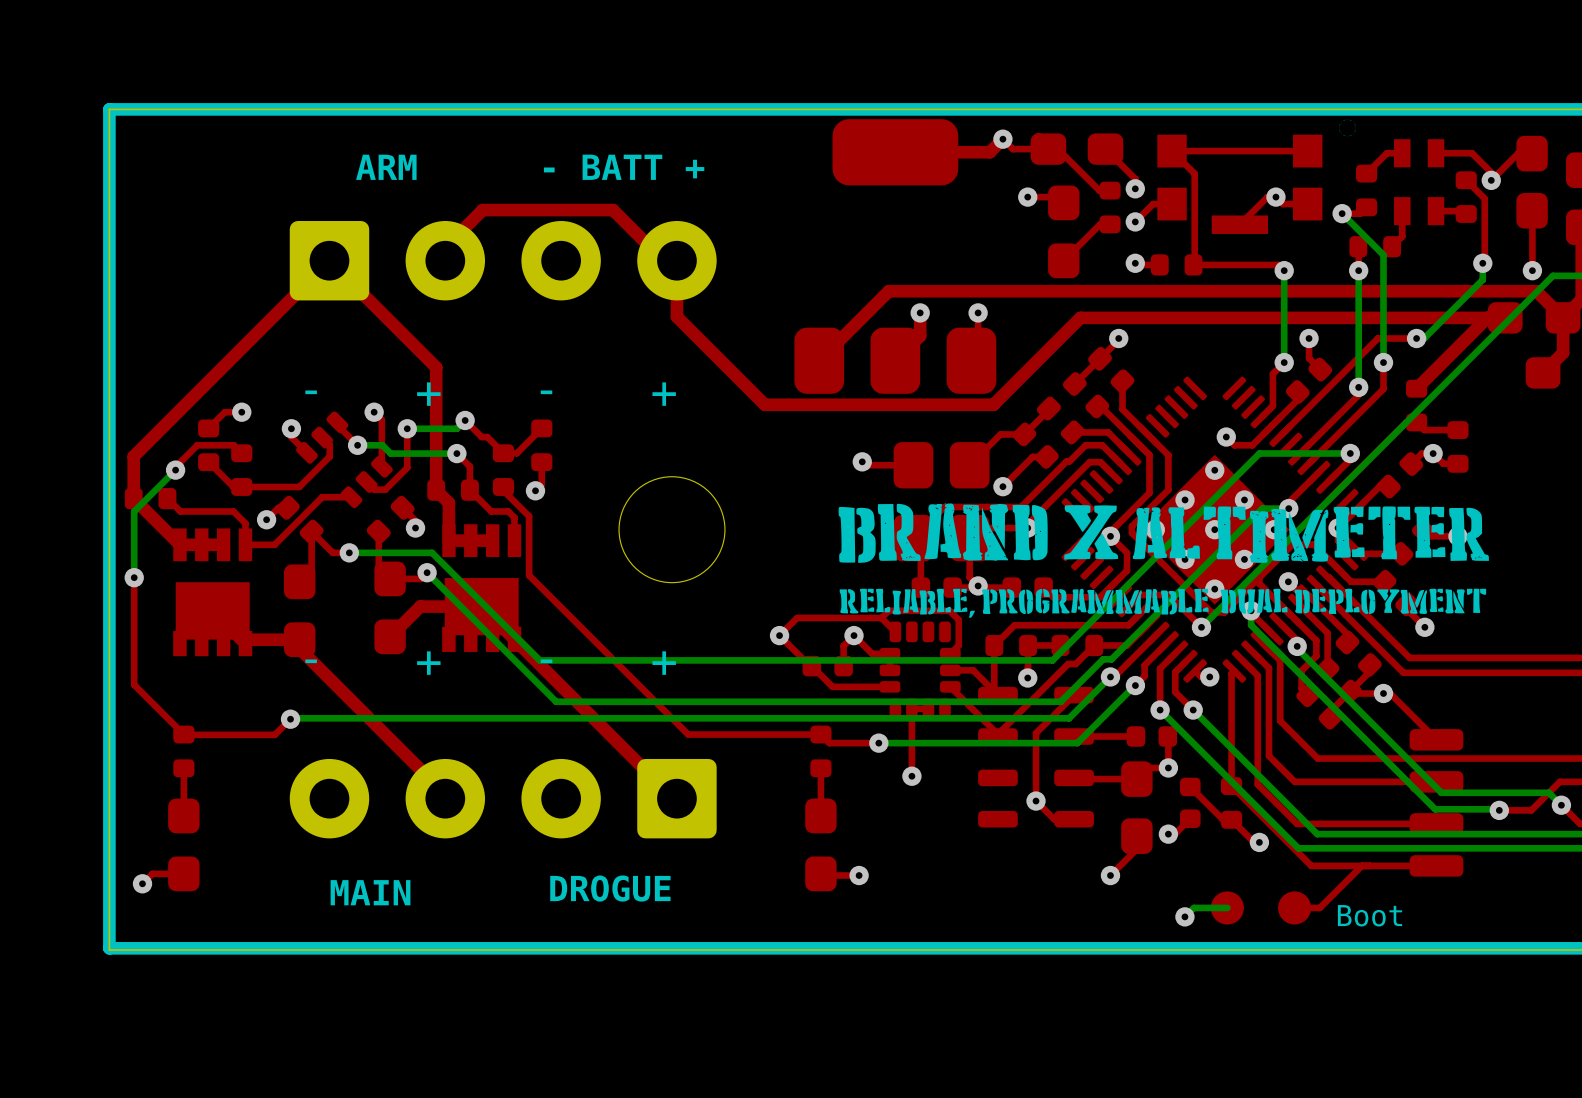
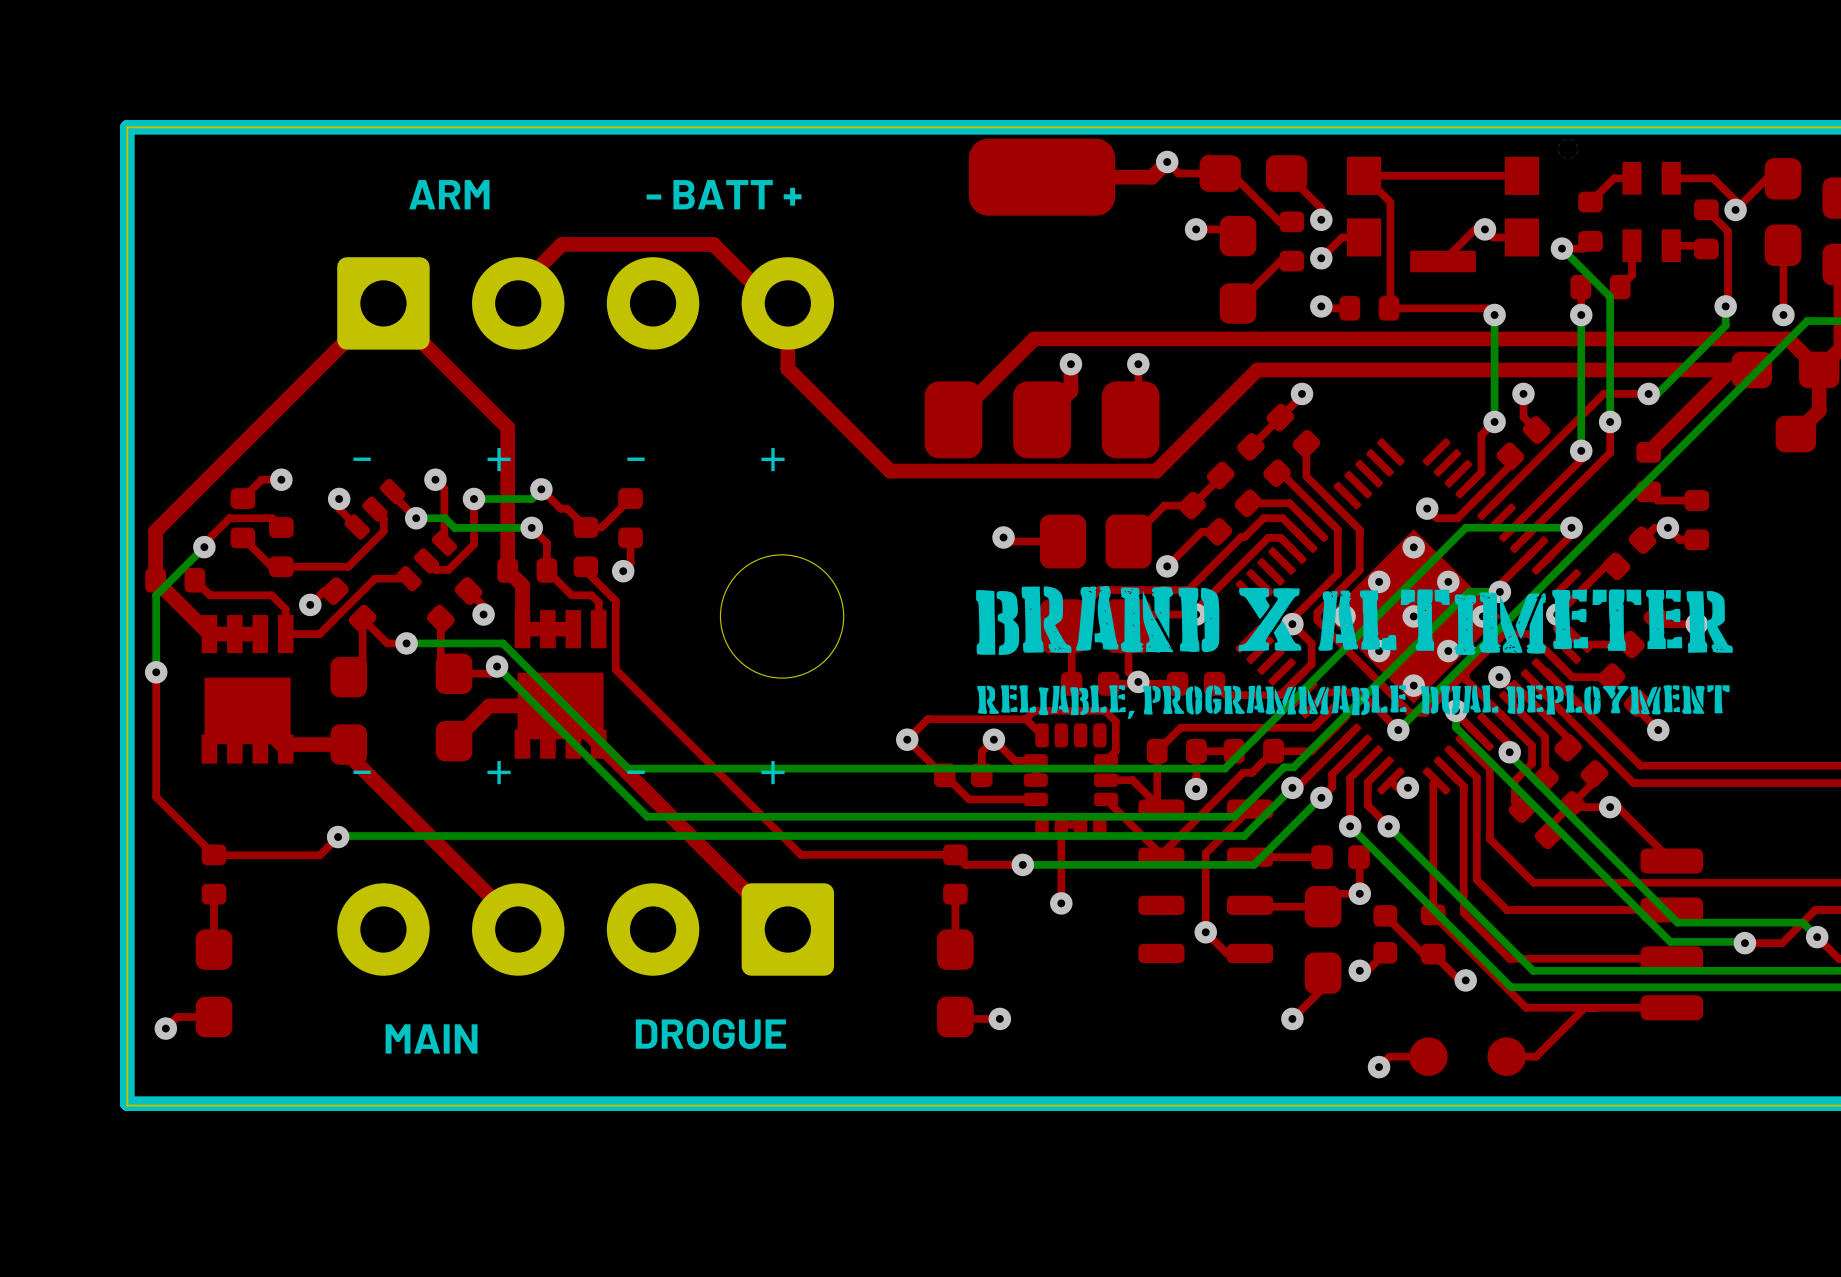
top track: none -> (1428, 1056) (1389, 1056) (1379, 1067)
bottom track: (1227, 907) (1193, 907) (1184, 916) -> none
text: Boot (1370, 915) -> none

